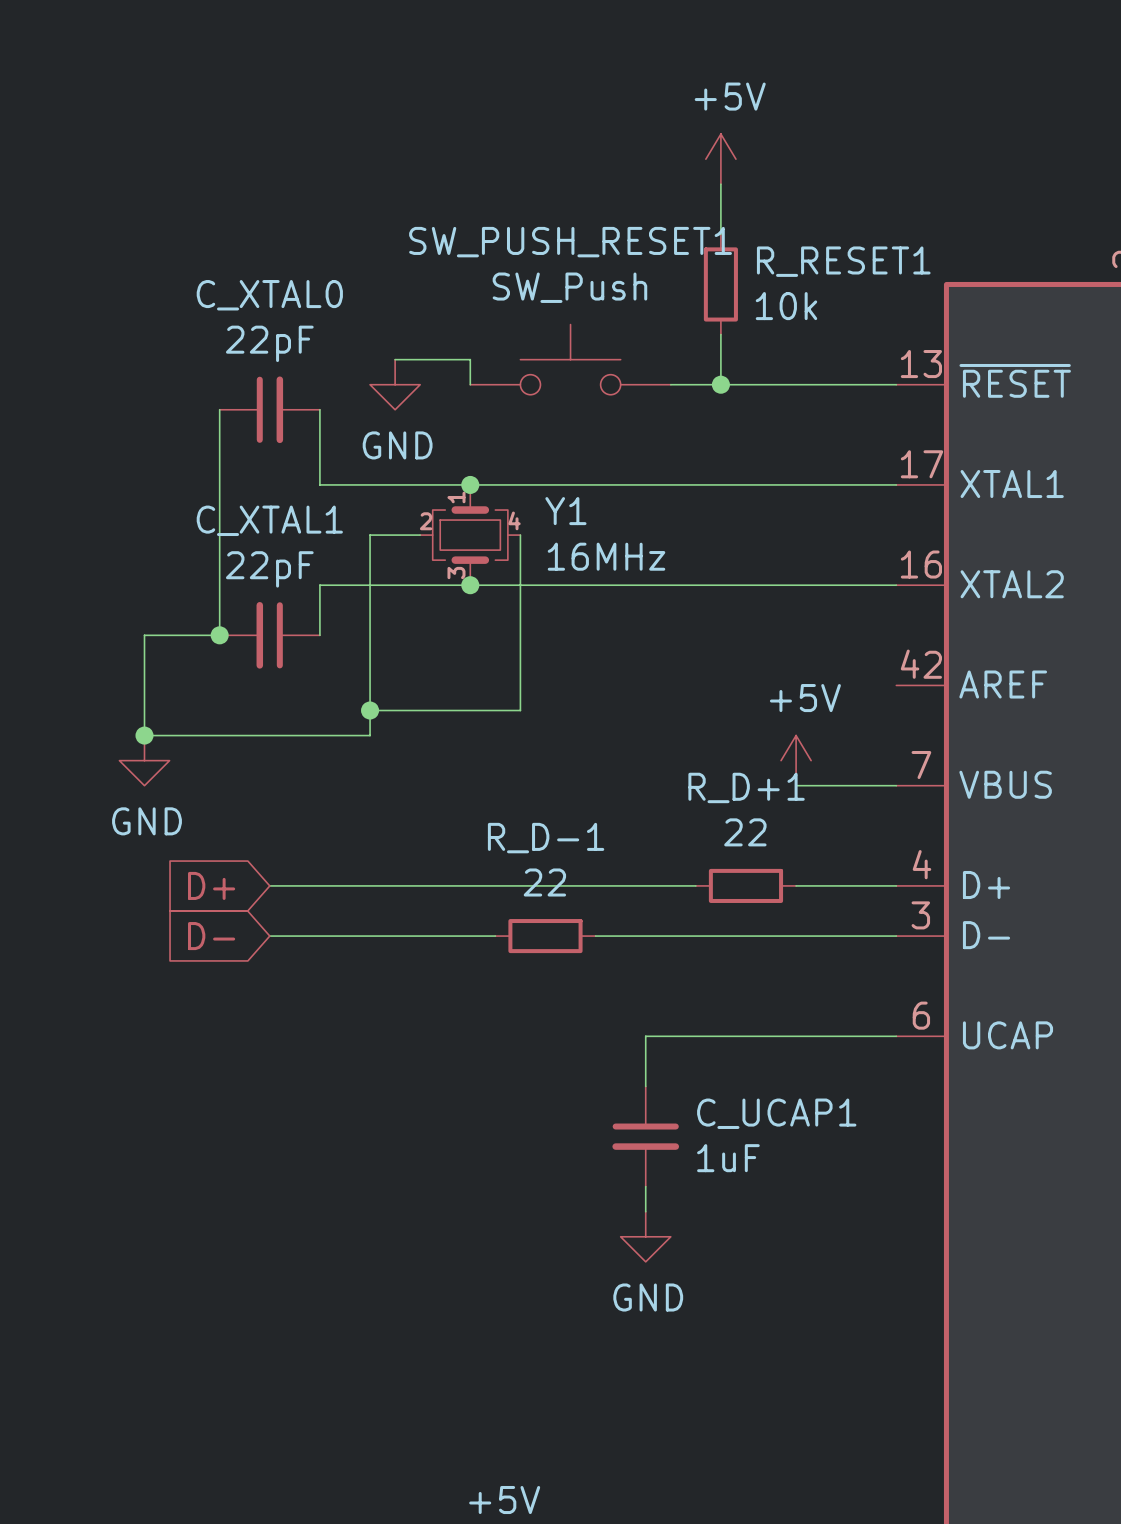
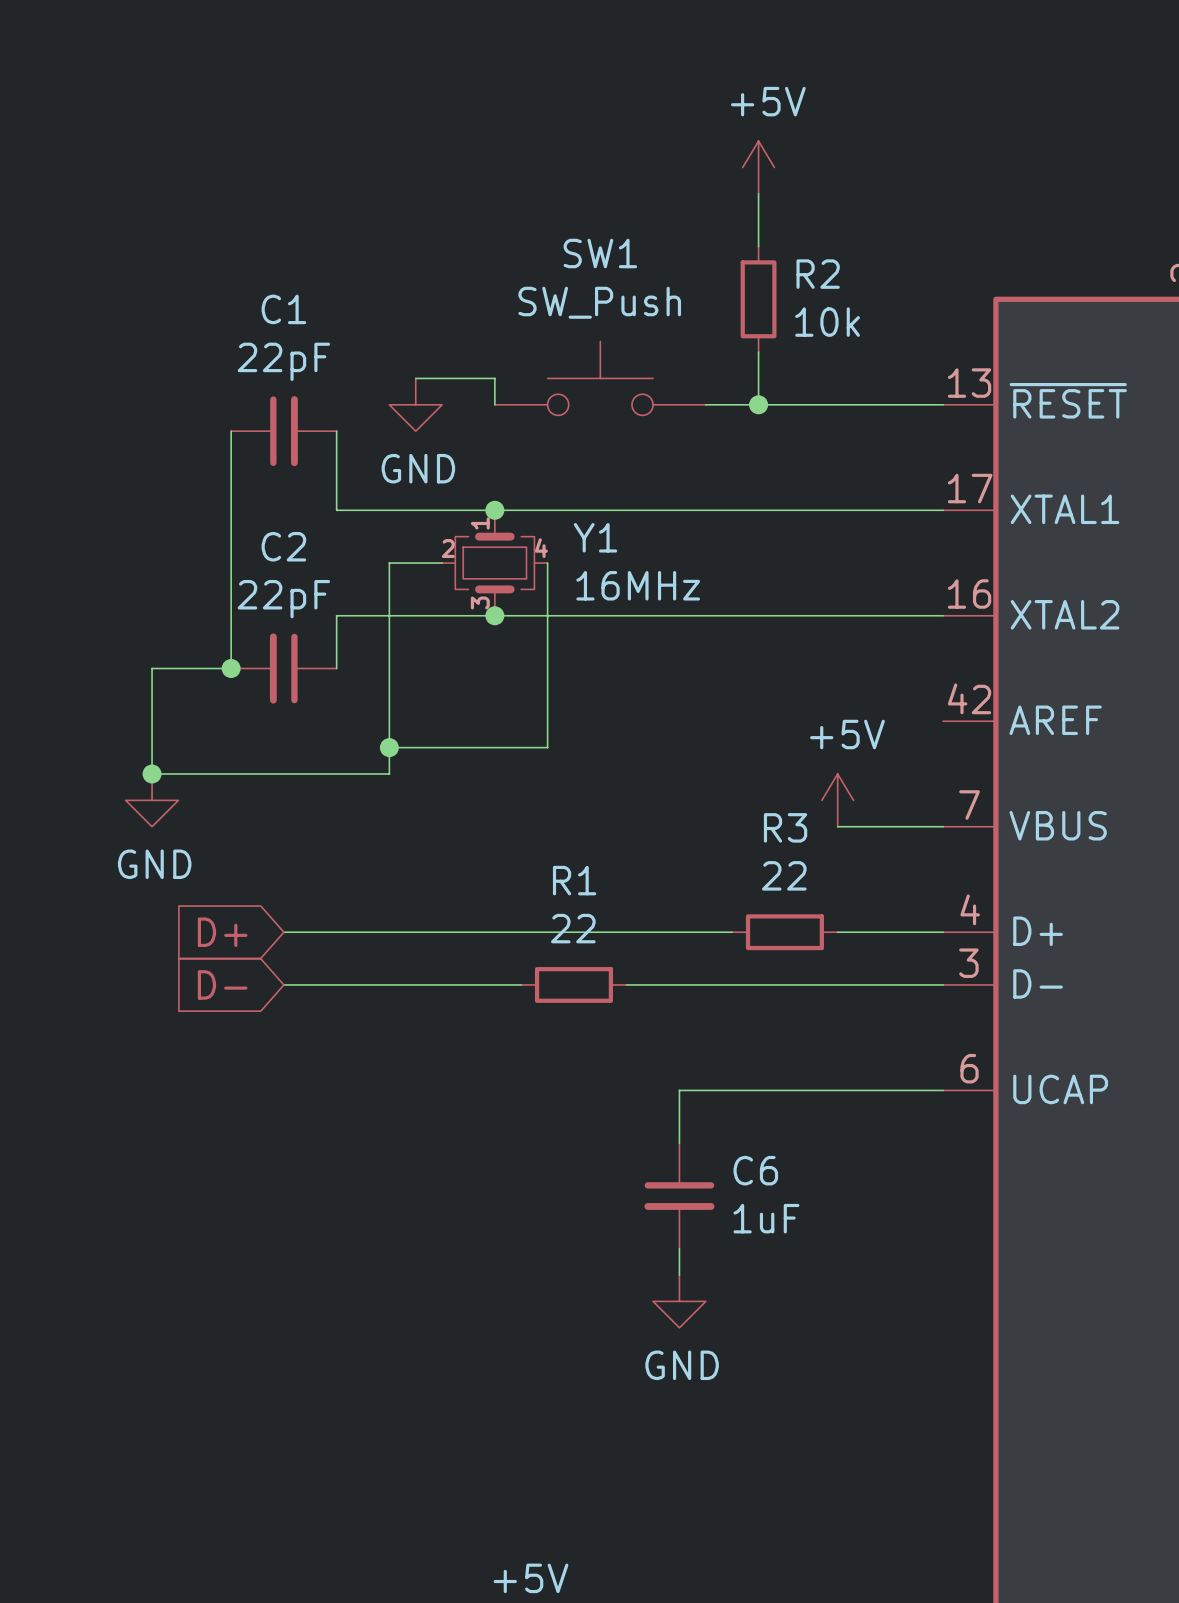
SW_PUSH_RESET1 name: SW_PUSH_RESET1 (570, 242) -> SW1 (600, 253)
R_RESET1 name: R_RESET1 (843, 261) -> R2 (818, 274)
C_XTAL0 name: C_XTAL0 (269, 295) -> C1 (283, 309)
C_XTAL1 name: C_XTAL1 (269, 520) -> C2 (283, 546)
R_D+1 name: R_D+1 (746, 787) -> R3 (785, 827)
R_D-1 name: R_D-1 (546, 838) -> R1 (574, 880)
C_UCAP1 name: C_UCAP1 (776, 1113) -> C6 (755, 1170)

